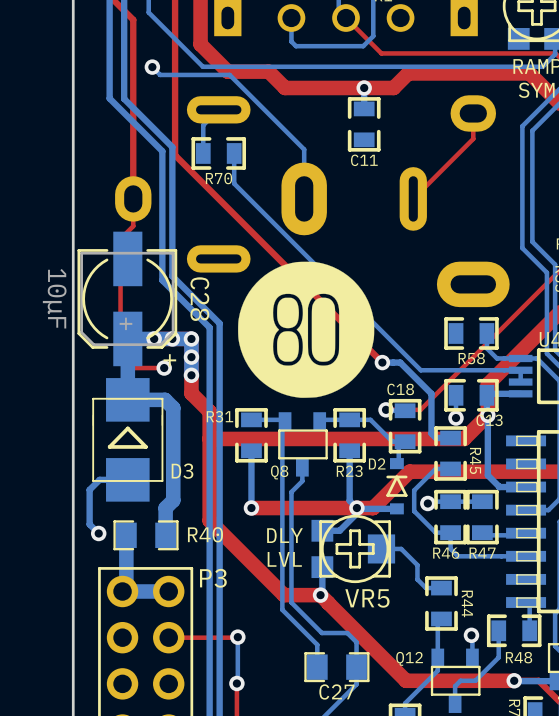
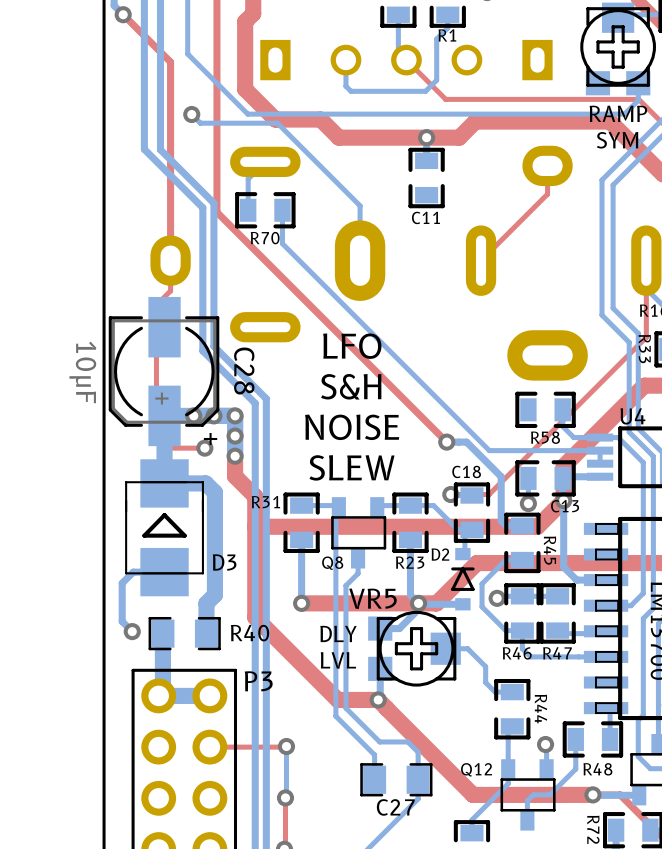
drawing: [238, 261, 375, 398] -> none
text: none -> LFO (352, 346)
text: none -> S&H (351, 386)
text: none -> NOISE (352, 427)
text: none -> SLEW (351, 467)
VR5 name position: VR5 (367, 598) -> VR5 (372, 598)

